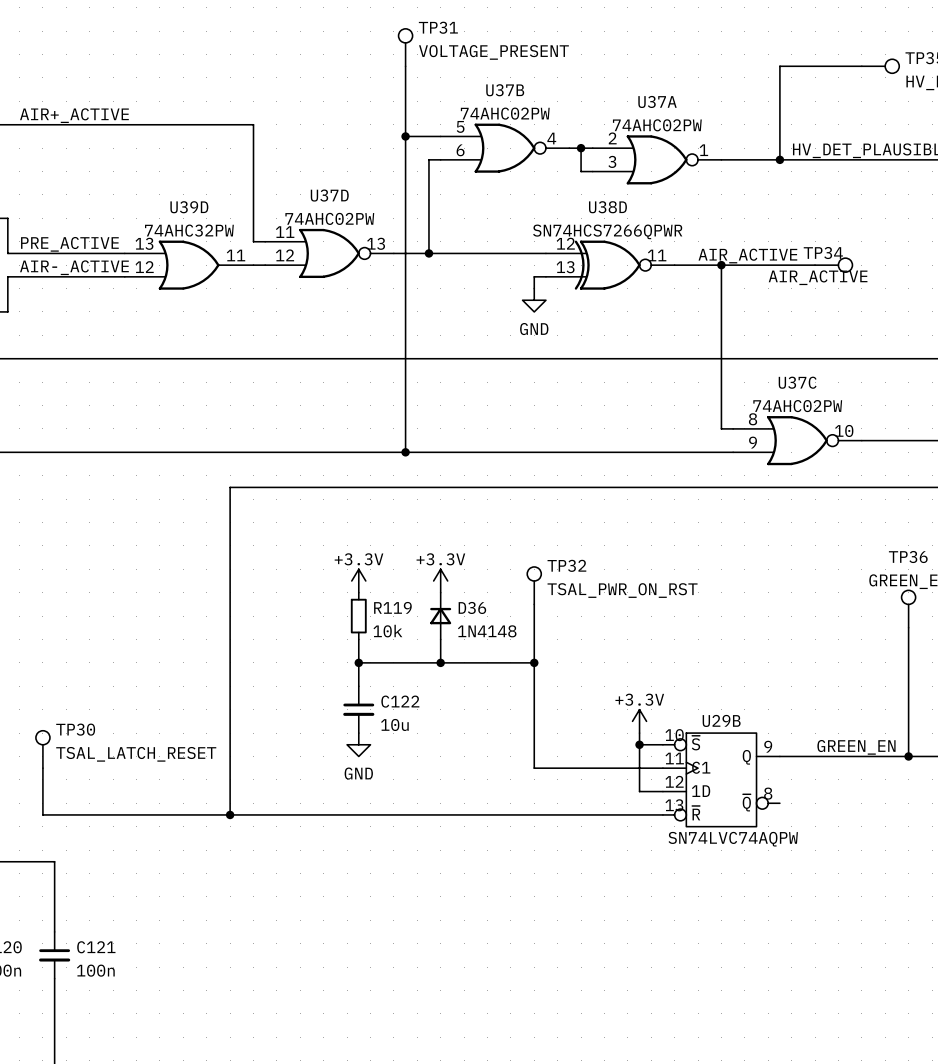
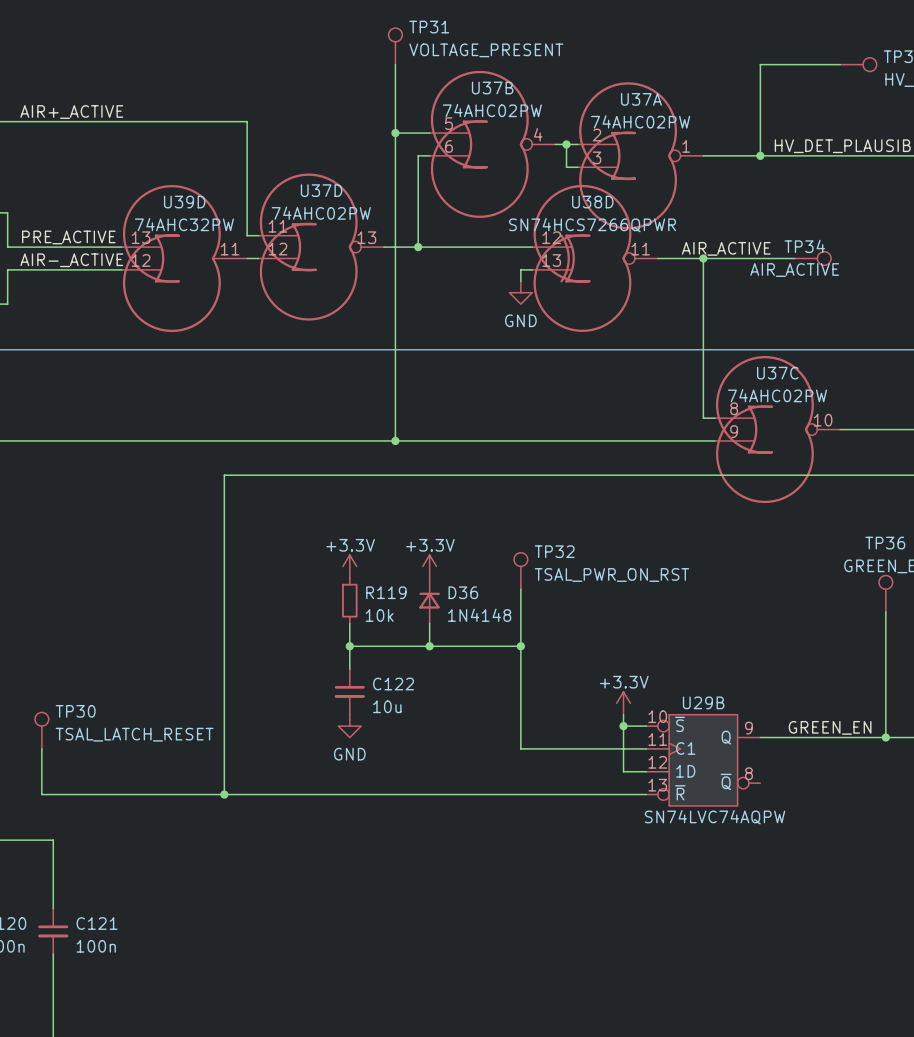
U37B symbol: [440, 123, 570, 173] -> [429, 70, 556, 218]
U37A symbol: [592, 135, 722, 185] -> [577, 82, 704, 230]
U37D symbol: [265, 228, 394, 279] -> [258, 173, 385, 321]
U39D symbol: [124, 240, 254, 290] -> [121, 185, 248, 333]
U38D symbol: [545, 240, 675, 290] -> [532, 184, 658, 332]
U37C symbol: [733, 416, 862, 466] -> [714, 355, 841, 504]

